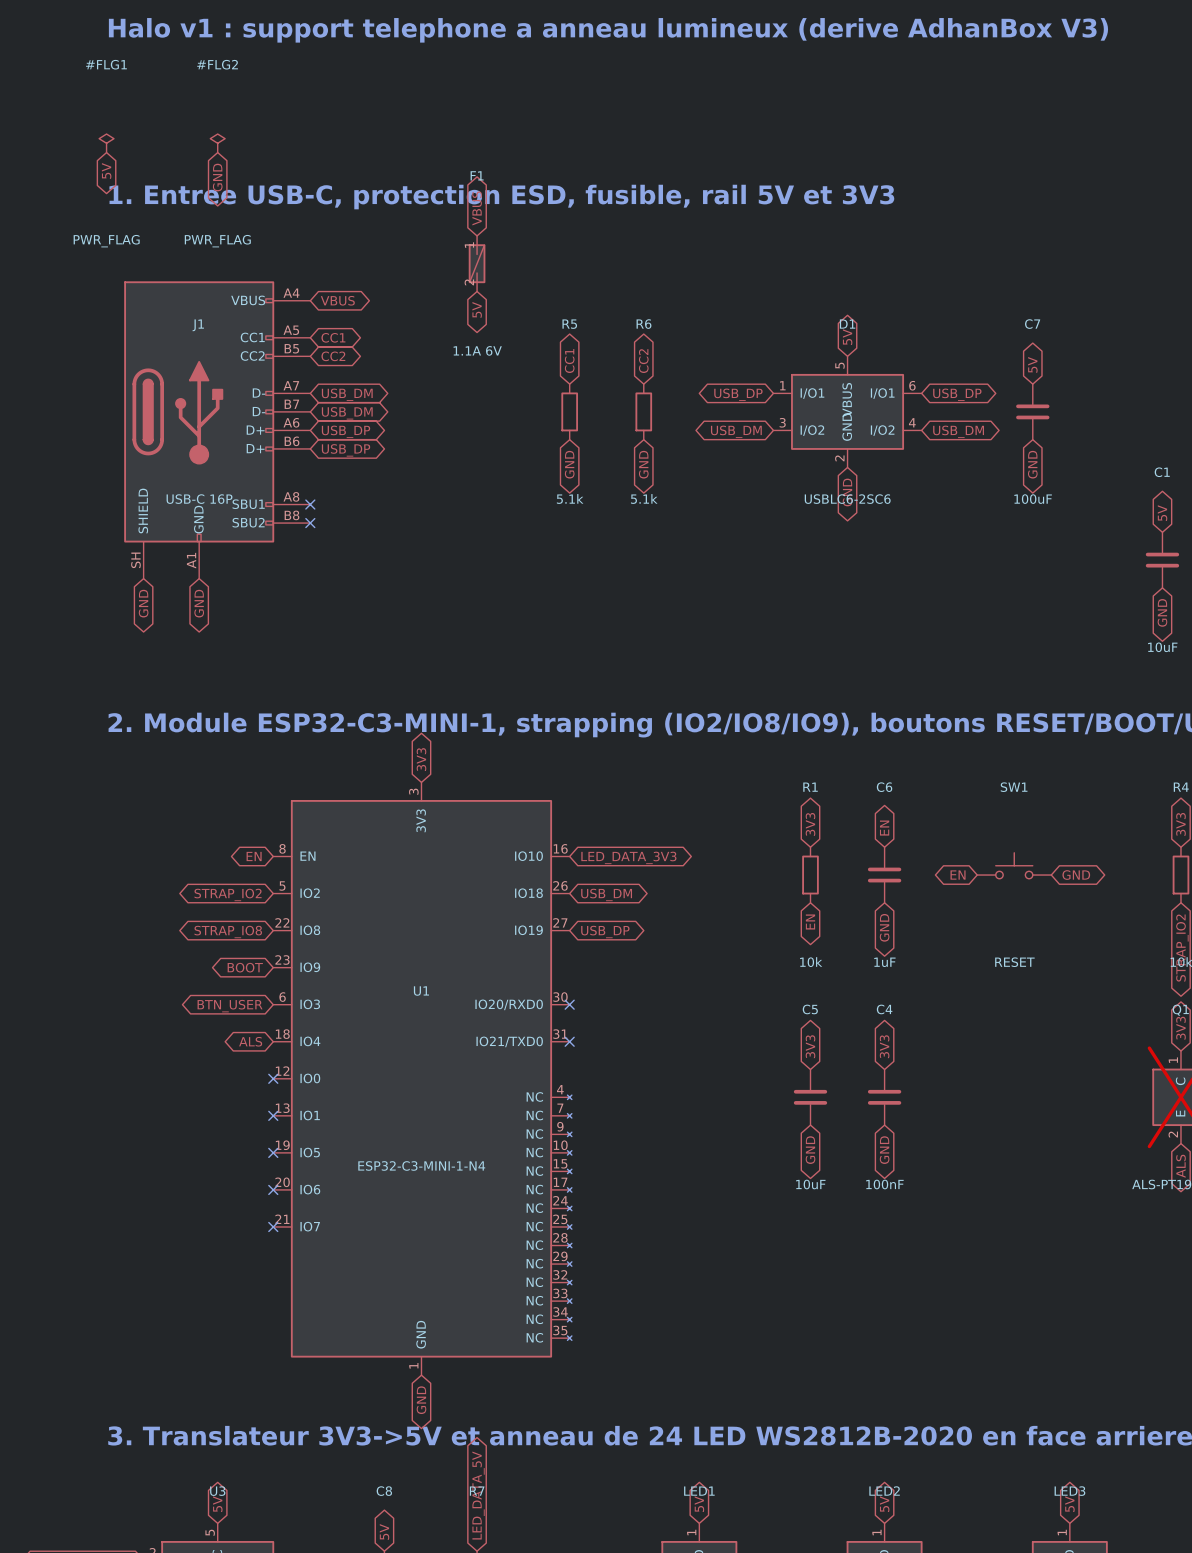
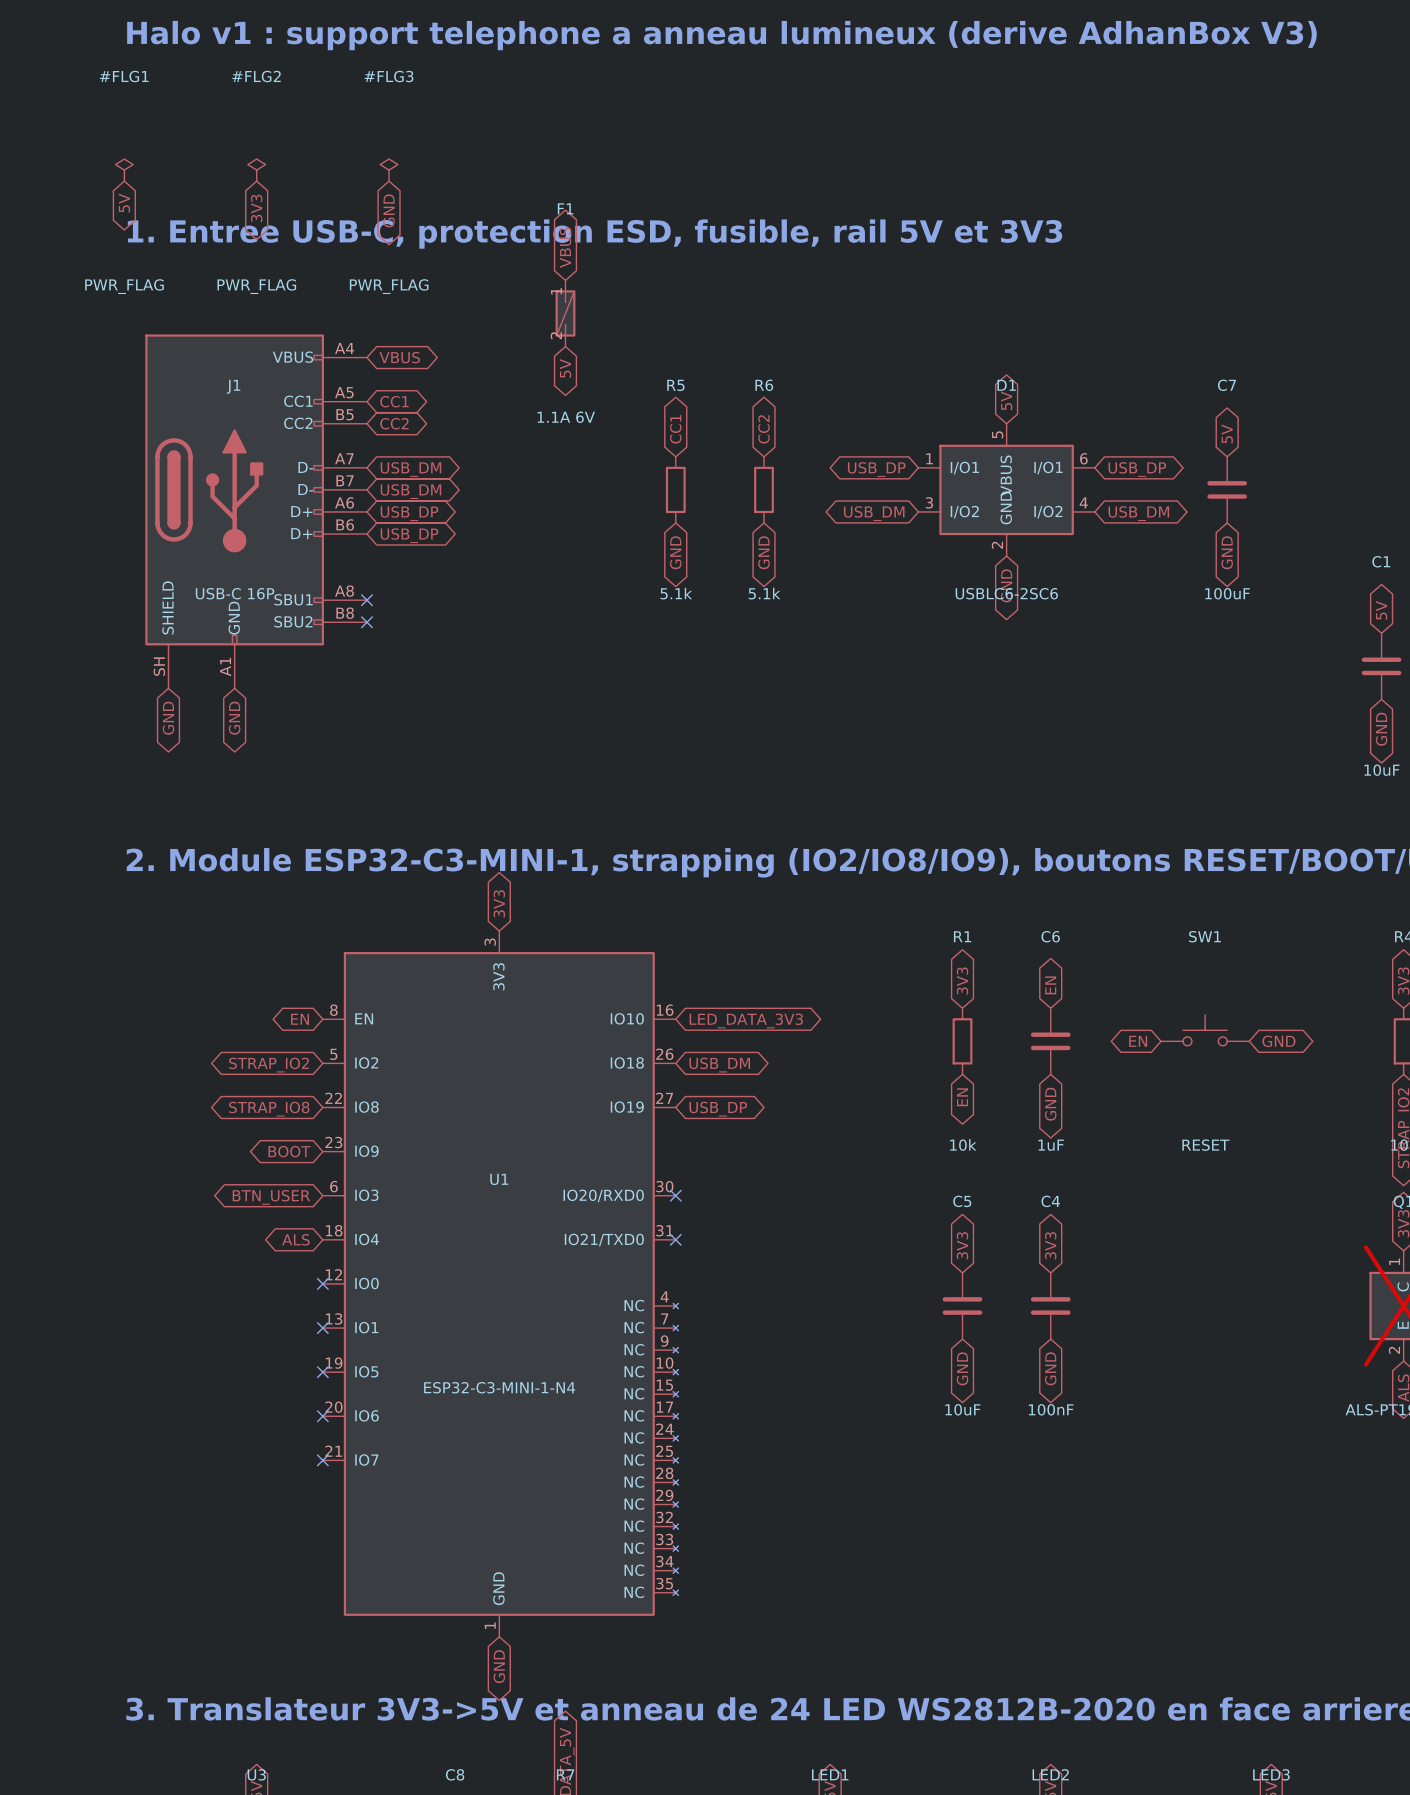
#FLG3: none -> PWR_FLAG (389, 170)
global label: GND (217, 177) -> 3V3 (256, 208)
global label: none -> GND (389, 210)

